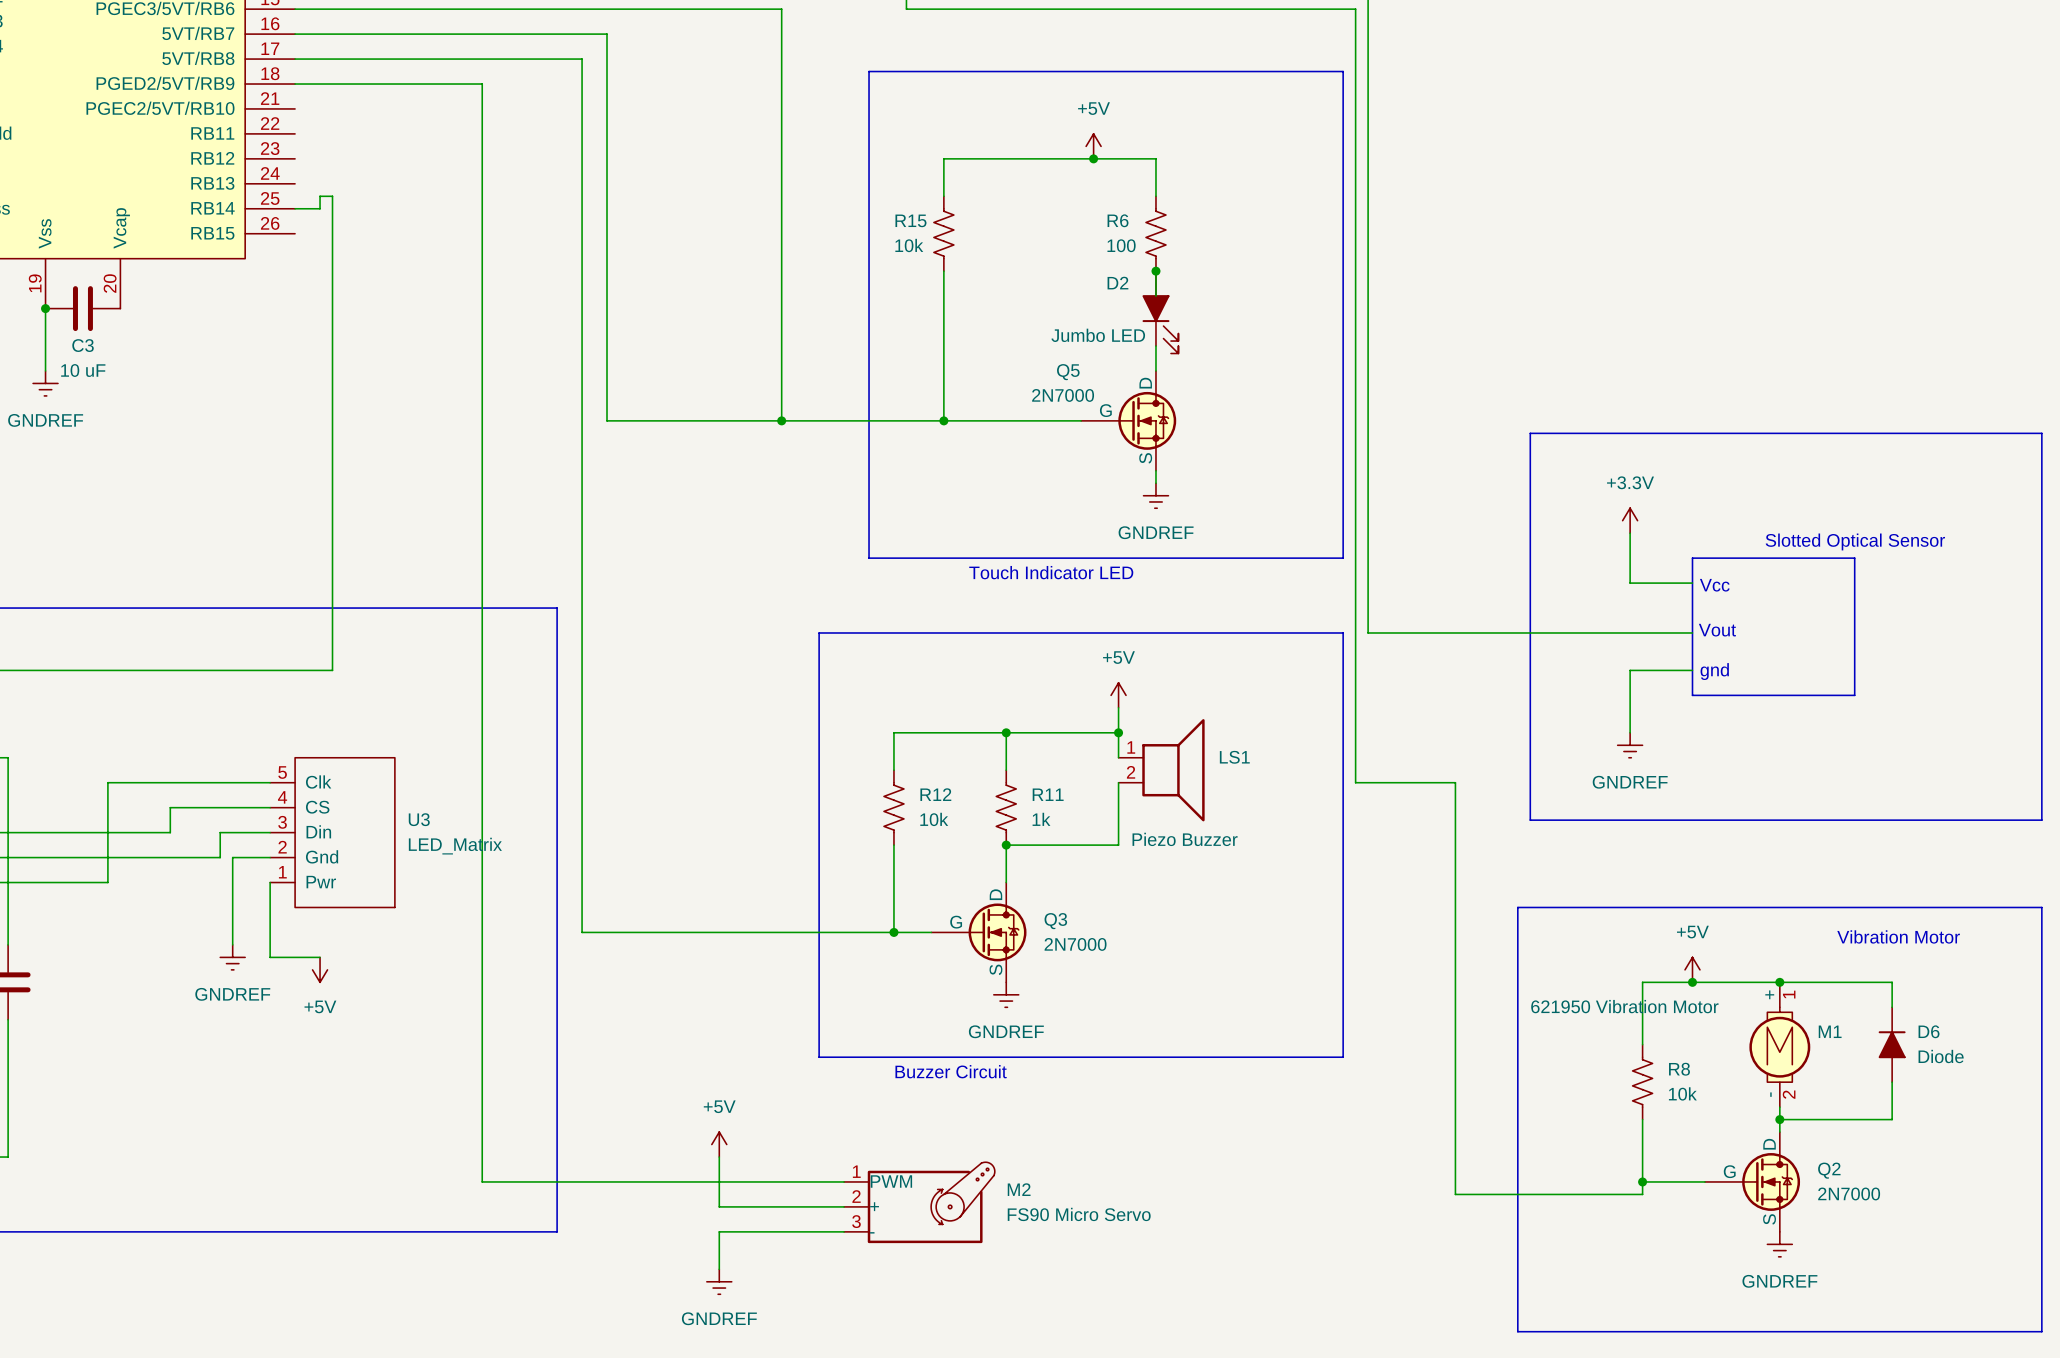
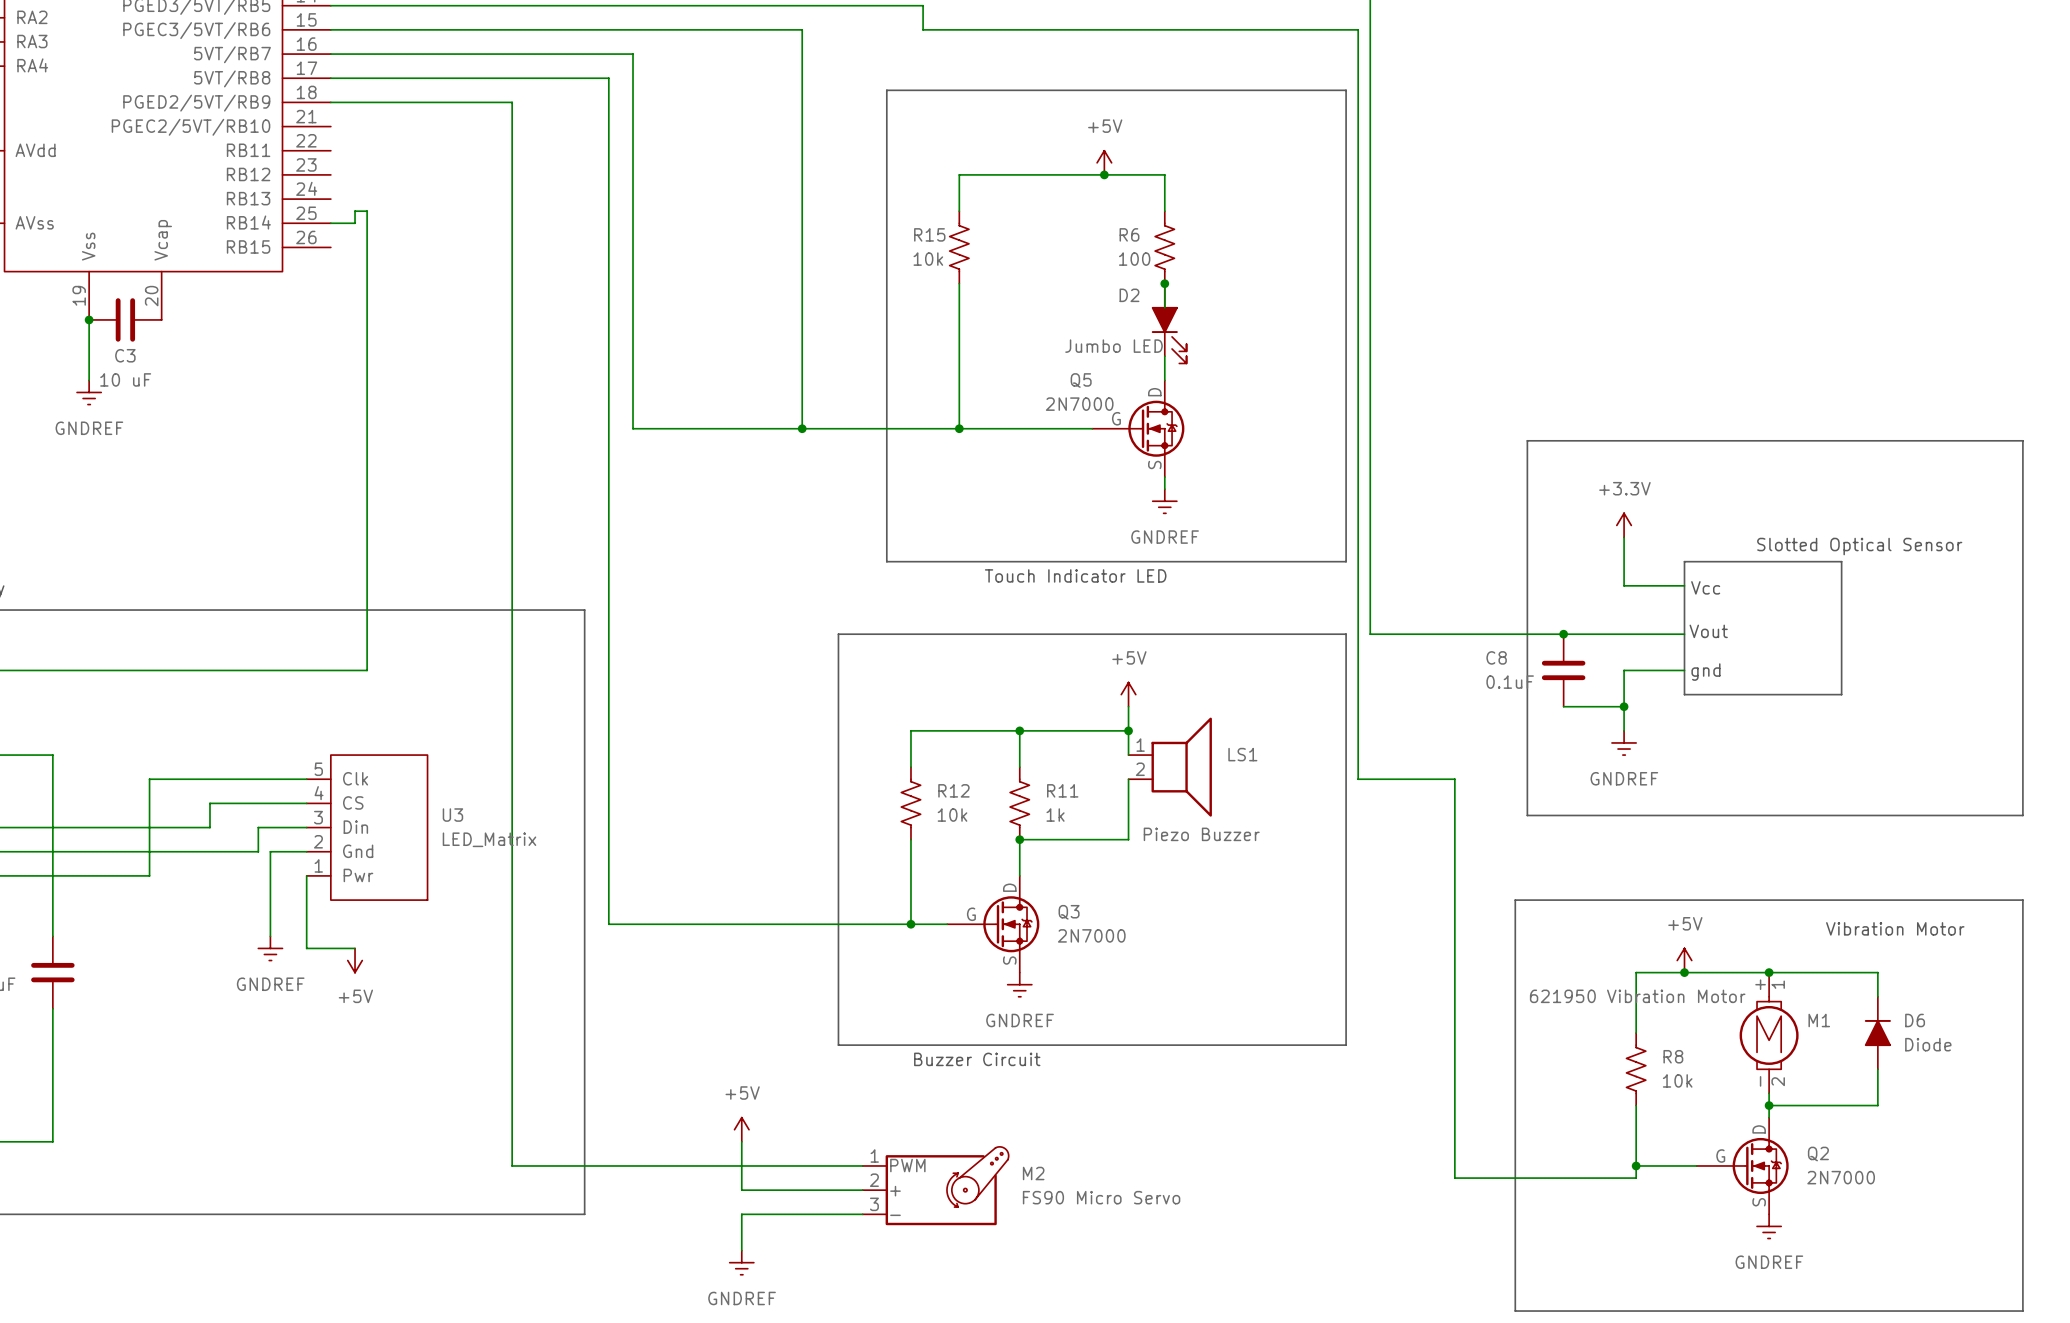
junction: none -> (1563, 634)
C8: none -> 0.1uF (1563, 670)
wire: none -> (1563, 706) (1624, 706)
junction: none -> (1624, 706)

